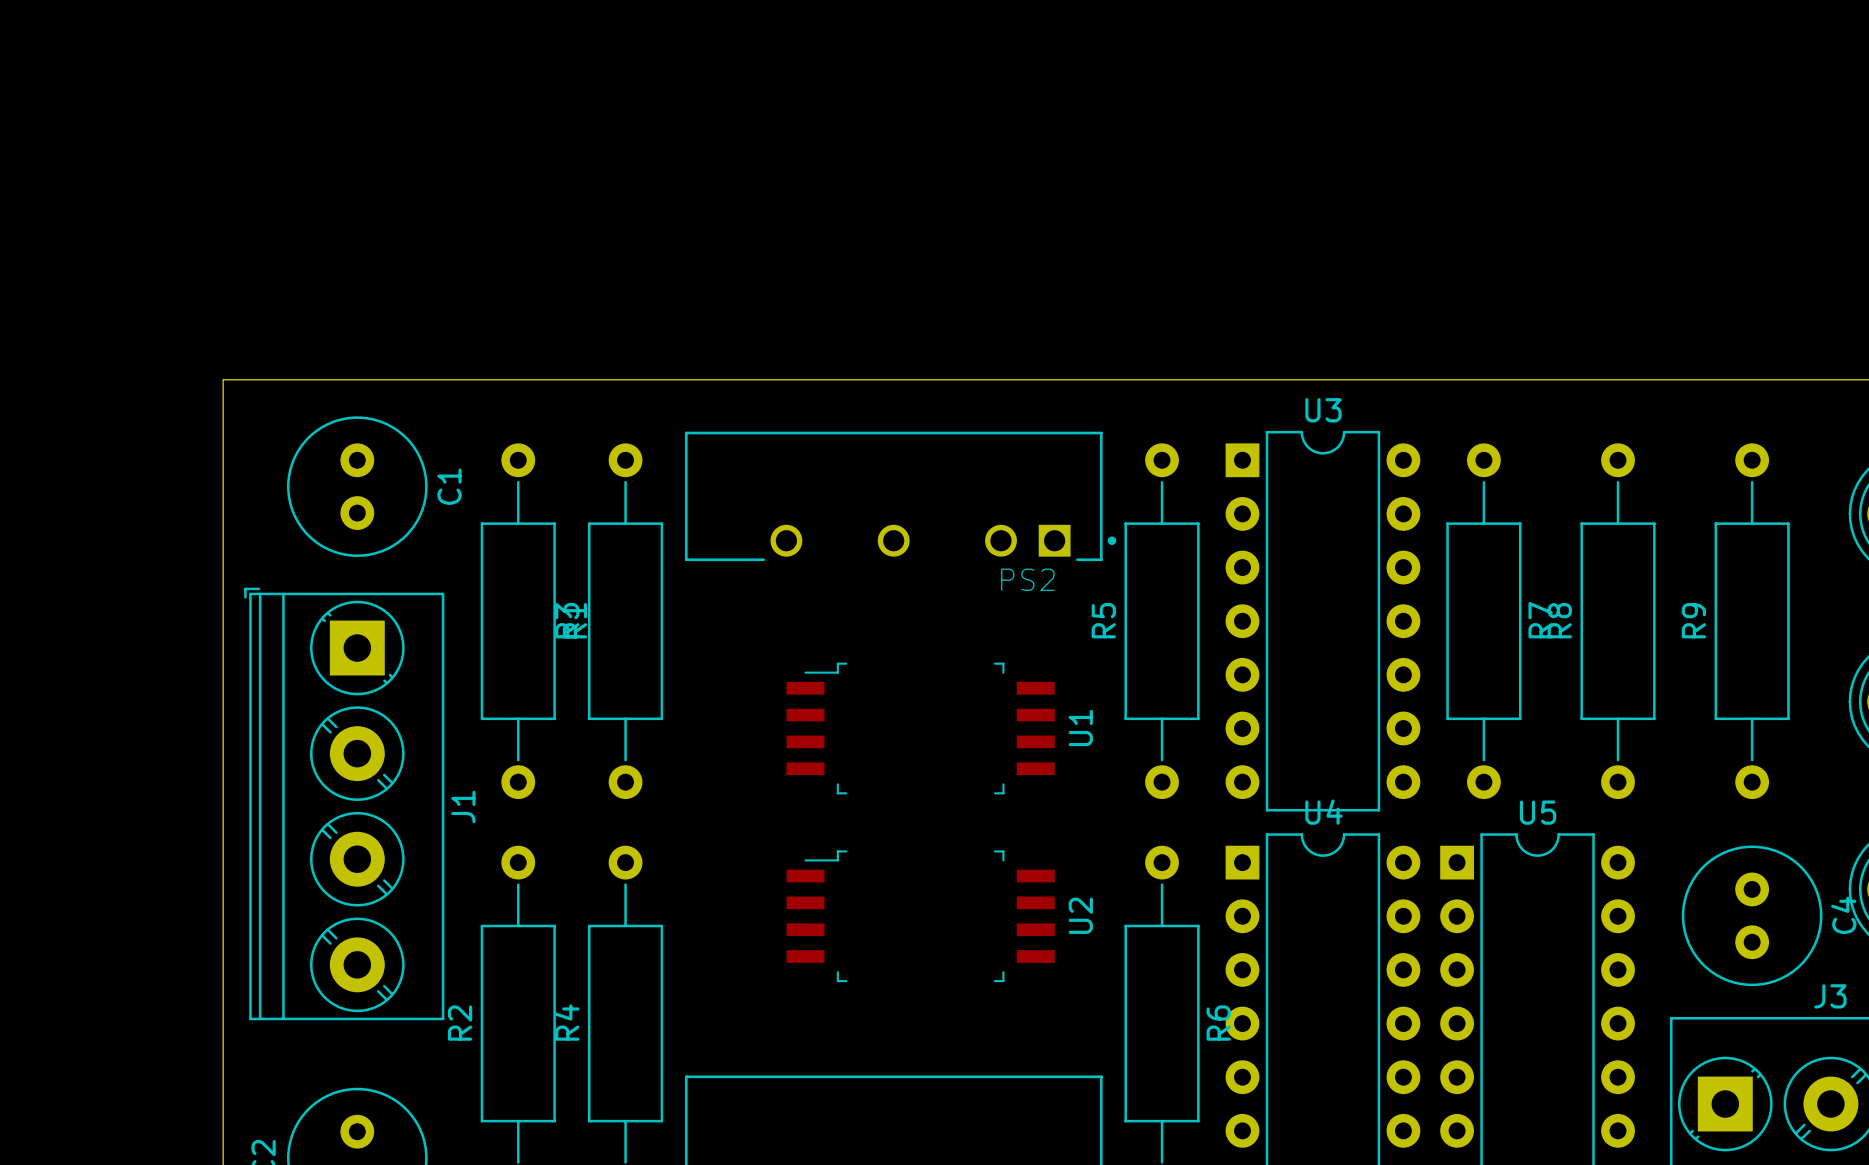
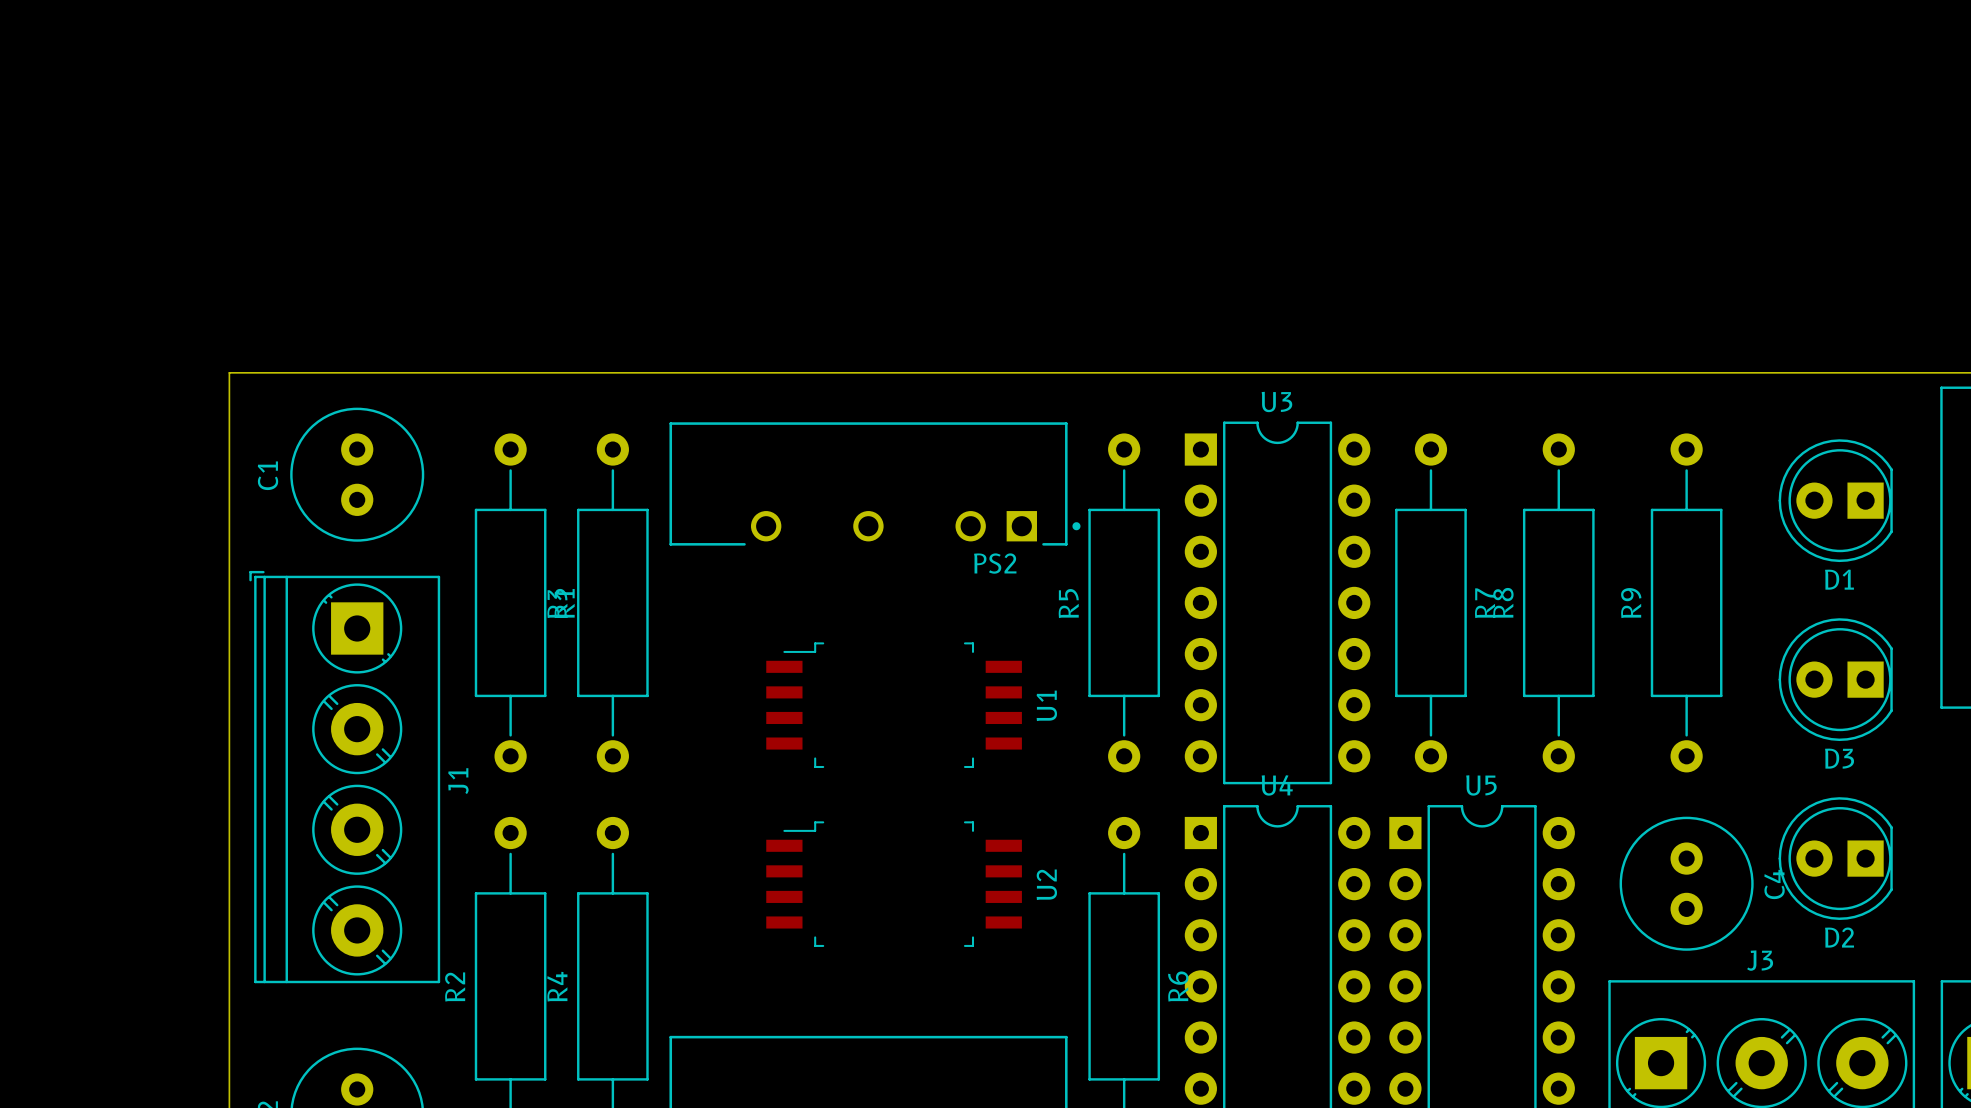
C1 name position: C1 (449, 486) -> C1 (268, 475)

